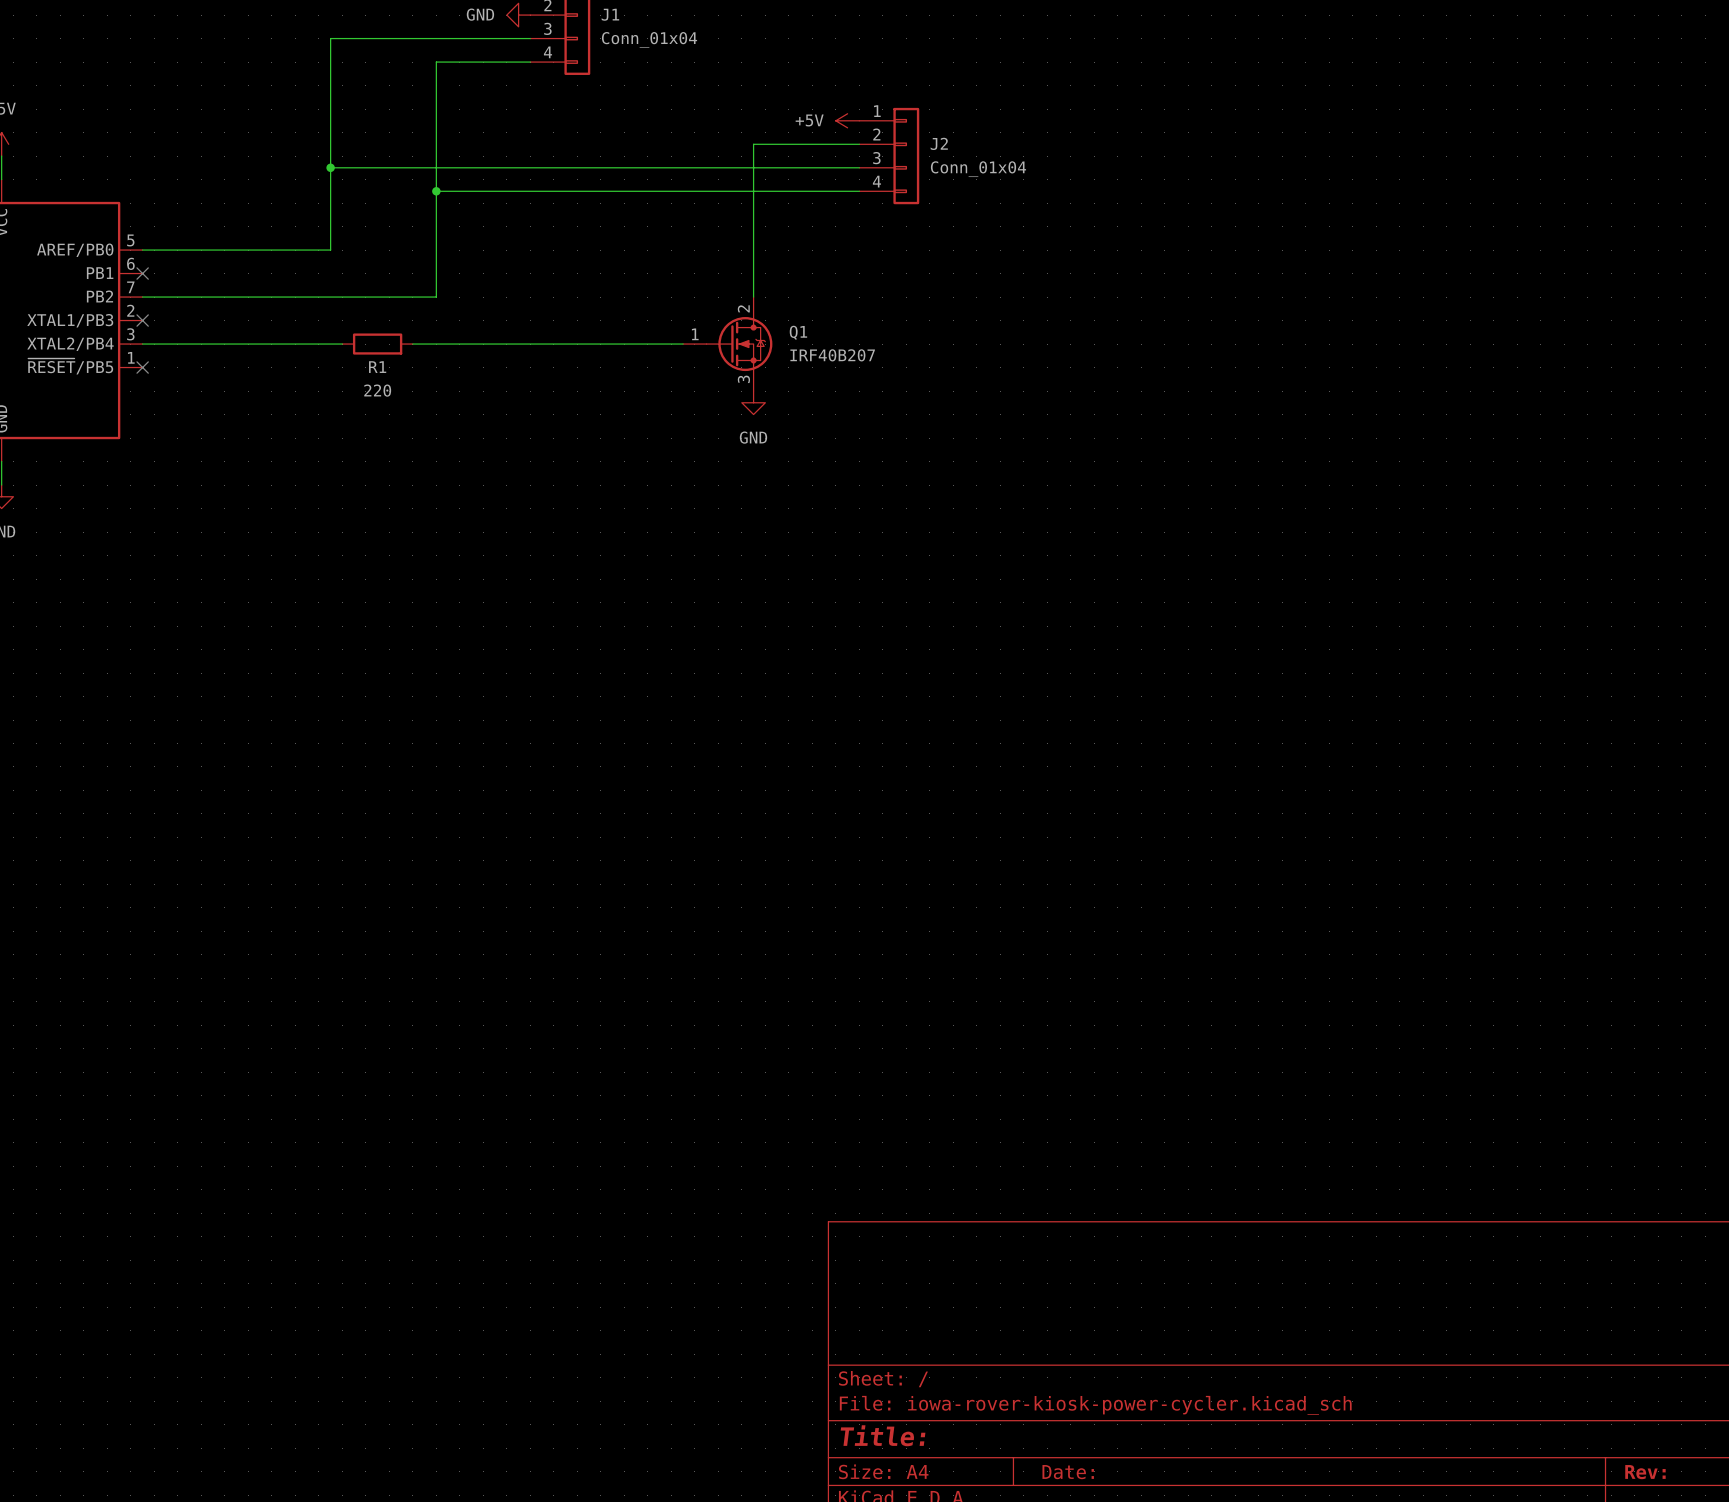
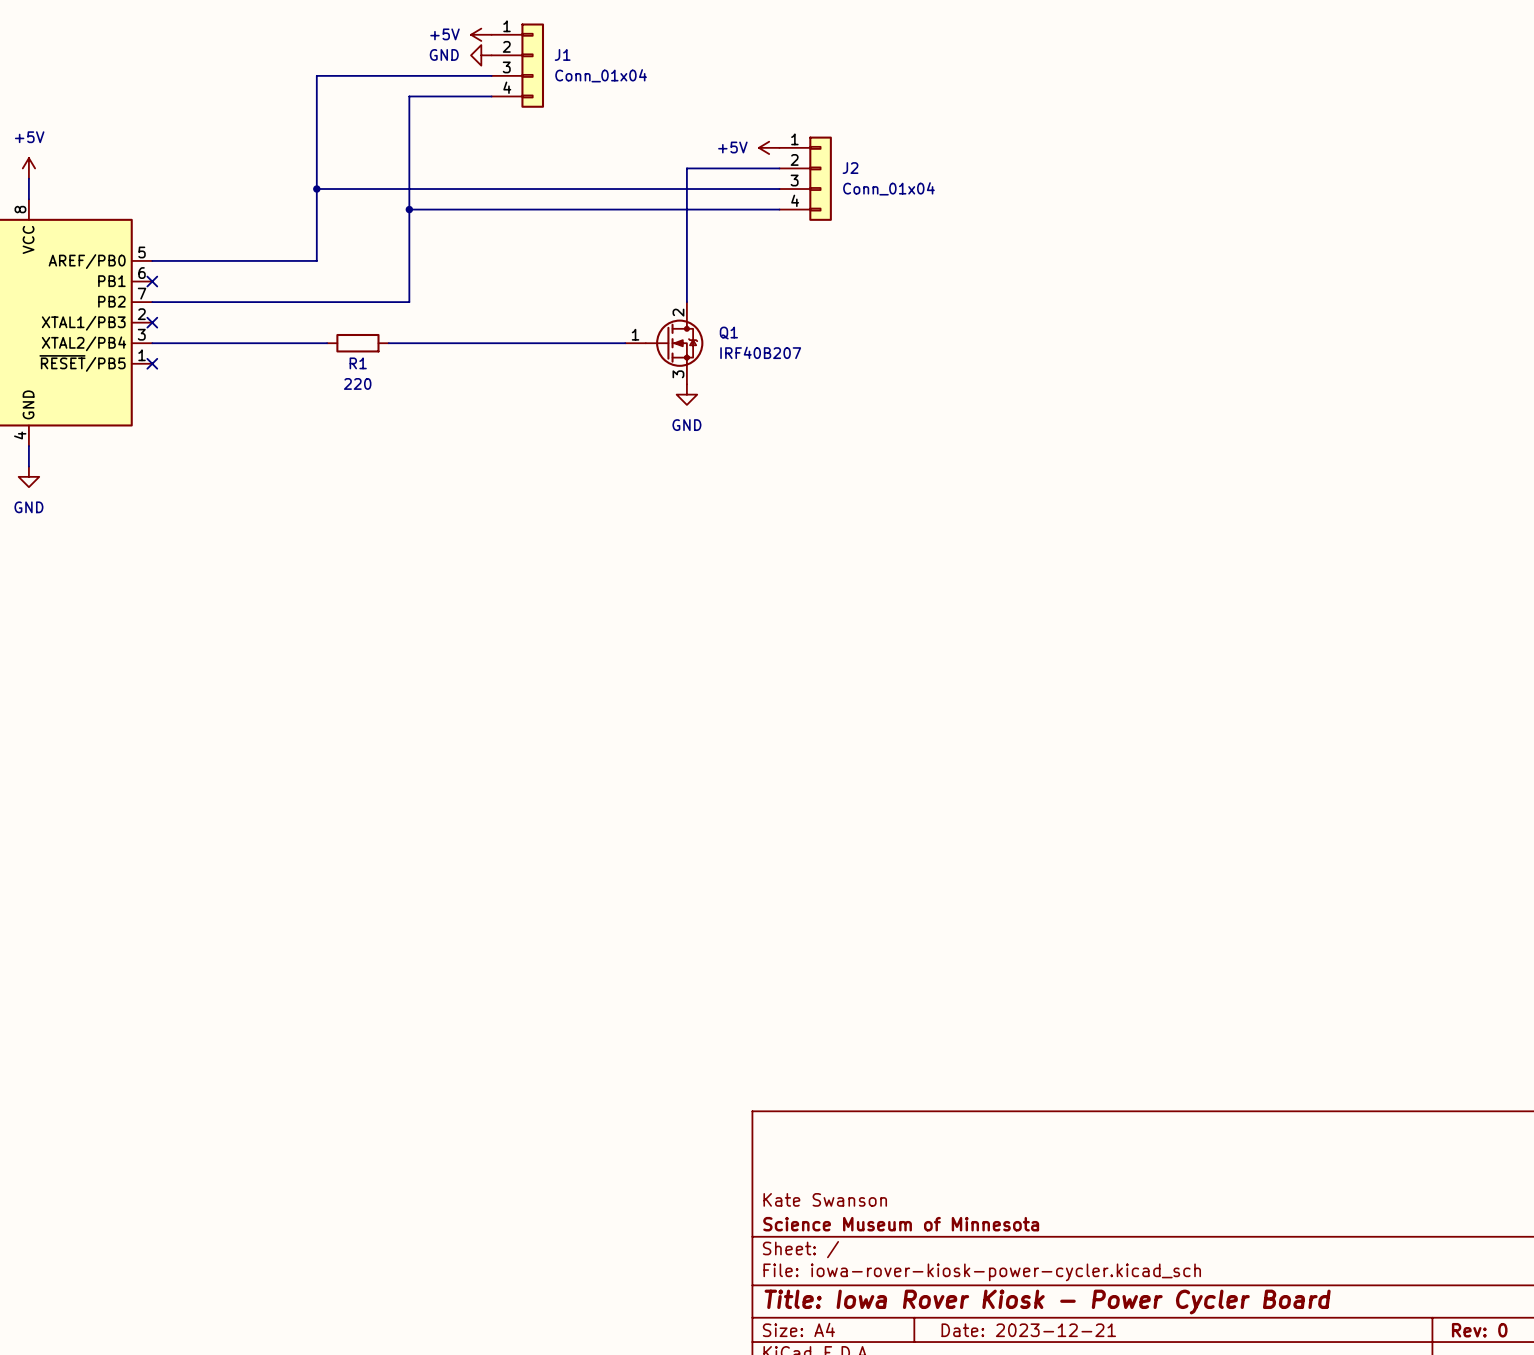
title block: none -> Kate Swanson (825, 1199)
title block: none -> Science Museum of Minnesota (901, 1224)
title block: Title: (883, 1435) -> Title: Iowa Rover Kiosk - Power Cycler Board (1047, 1302)
title block: Date: (1068, 1472) -> Date: 2023-12-21 (1028, 1330)
title block: Rev: (1645, 1472) -> Rev: 0 (1479, 1330)

